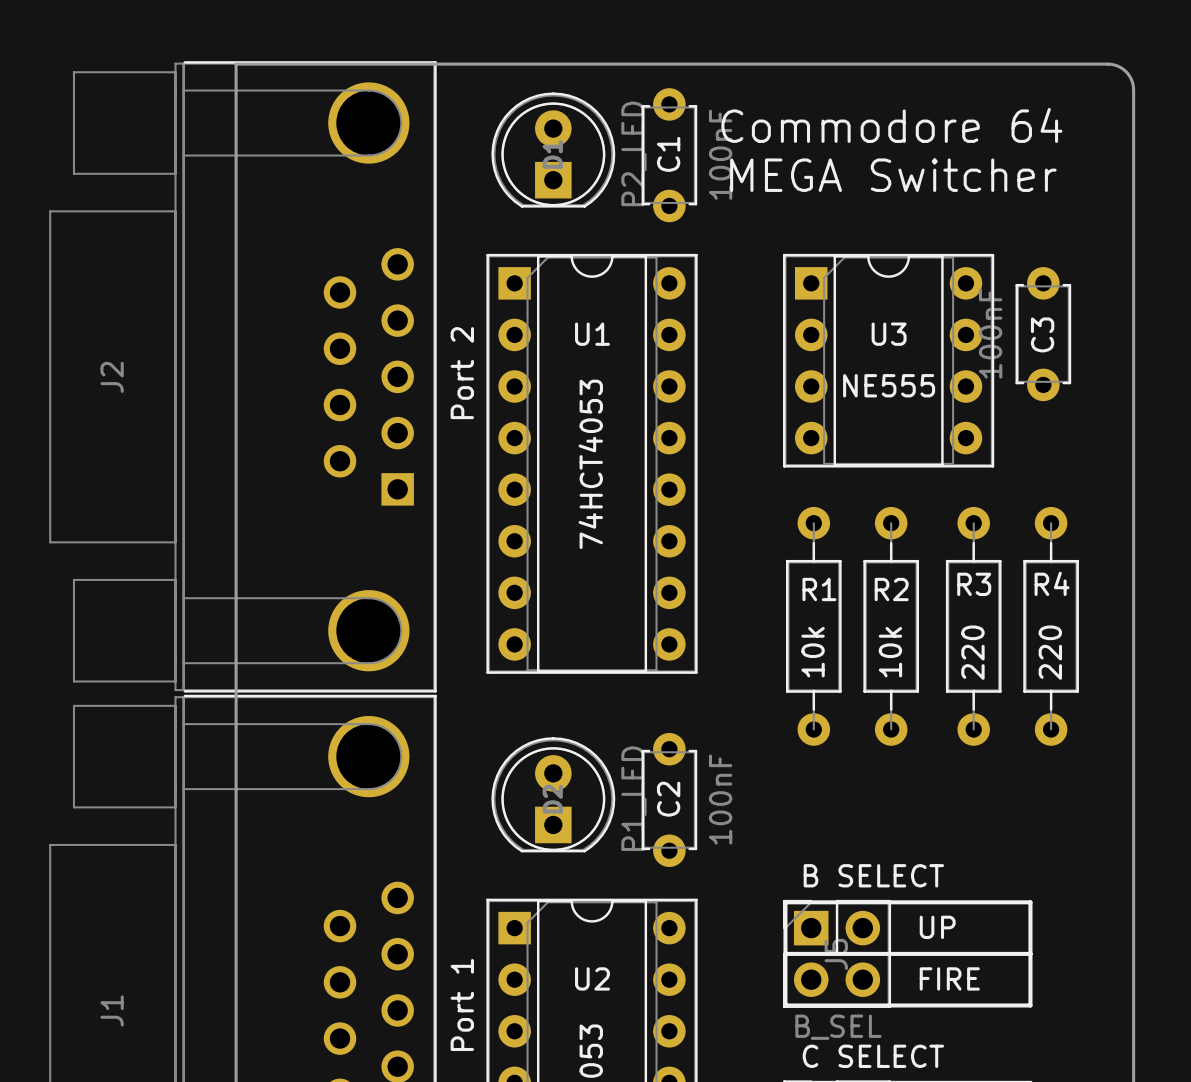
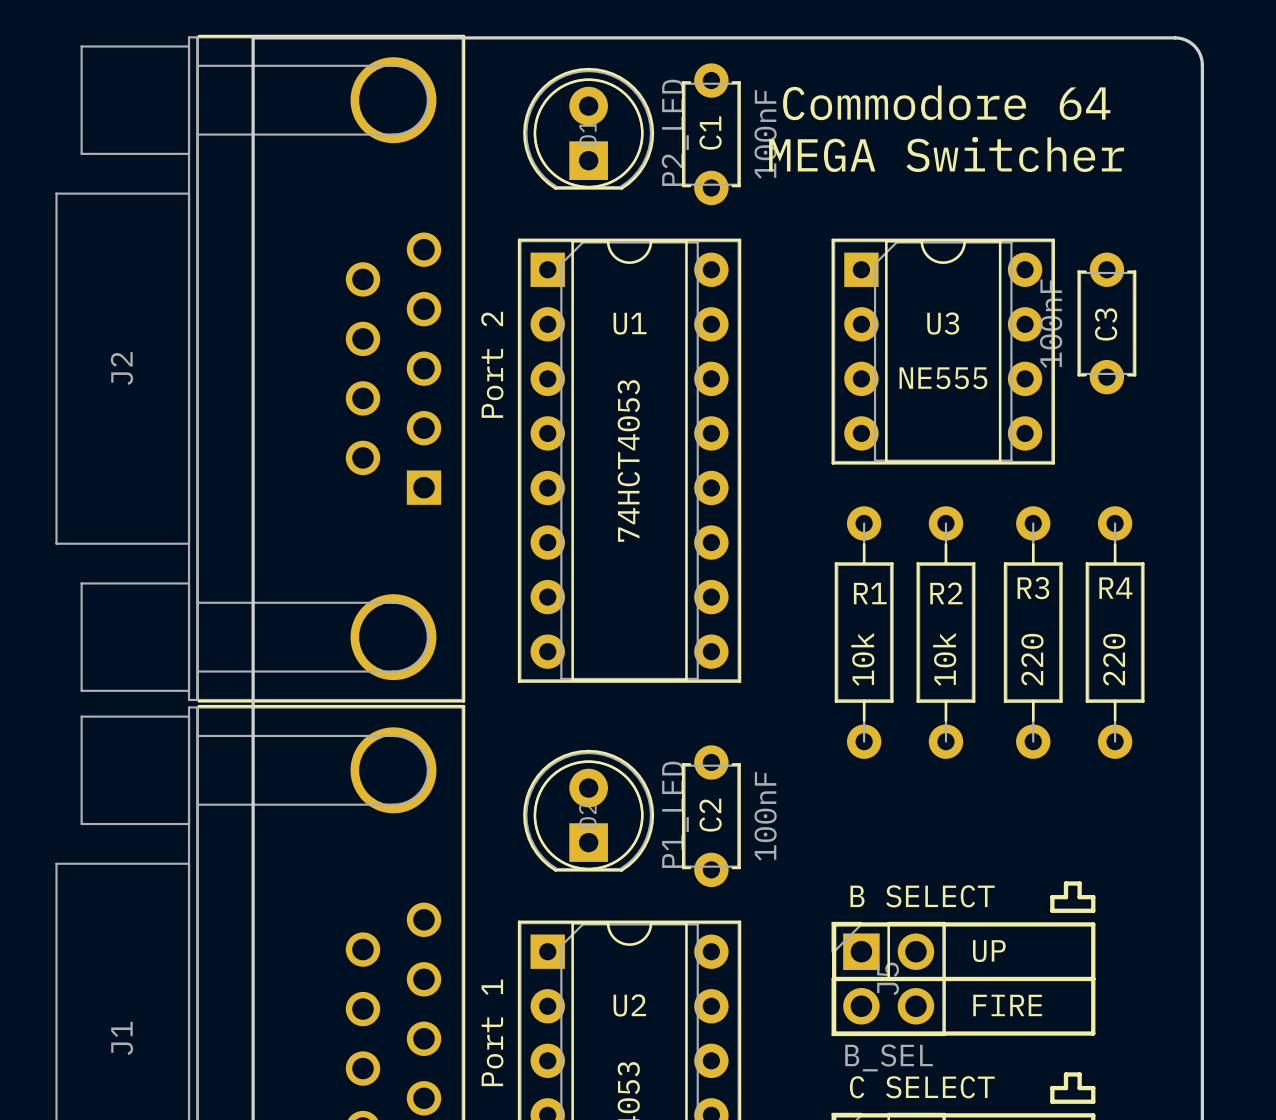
line: none -> (1065, 883) (1065, 897) (1052, 897) (1052, 910) (1093, 910) (1093, 897) (1079, 897) (1079, 883) (1065, 883)
line: none -> (1065, 1074) (1065, 1088) (1052, 1088) (1052, 1101) (1093, 1101) (1093, 1088) (1079, 1088) (1079, 1074) (1065, 1074)

